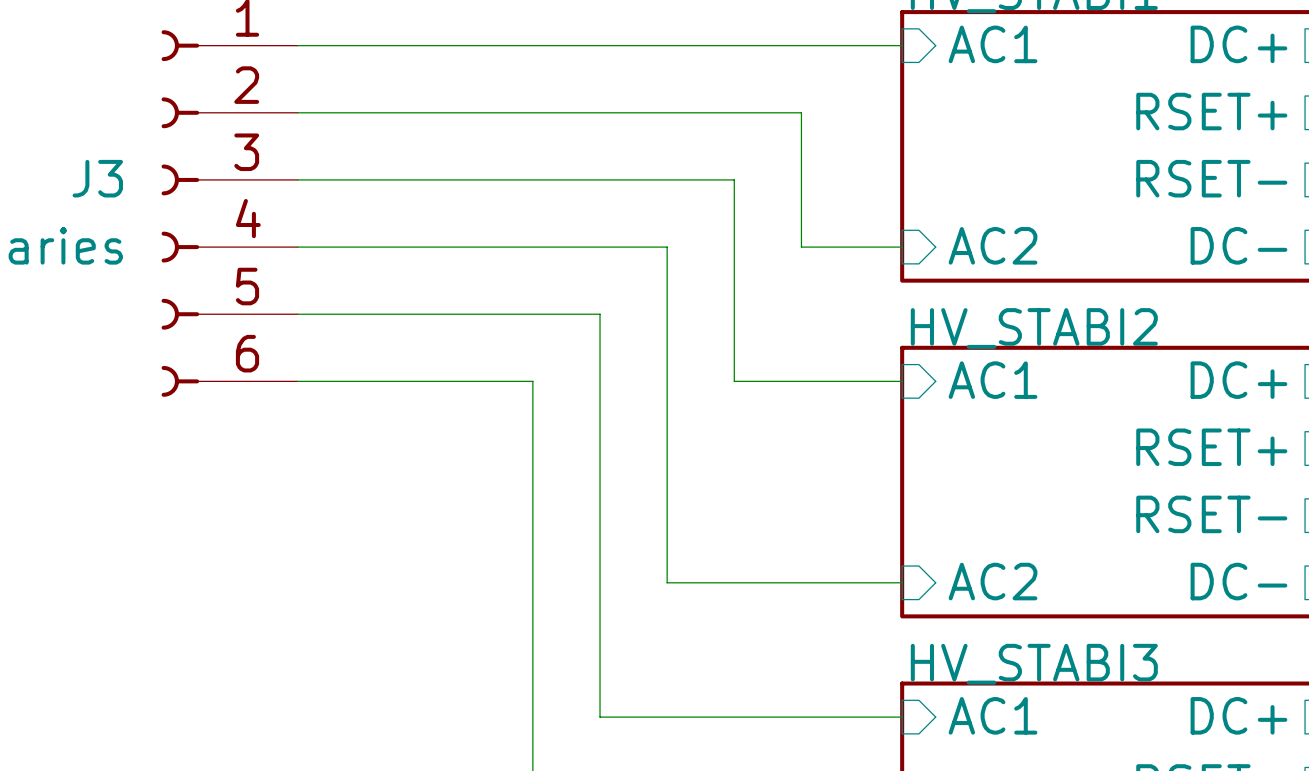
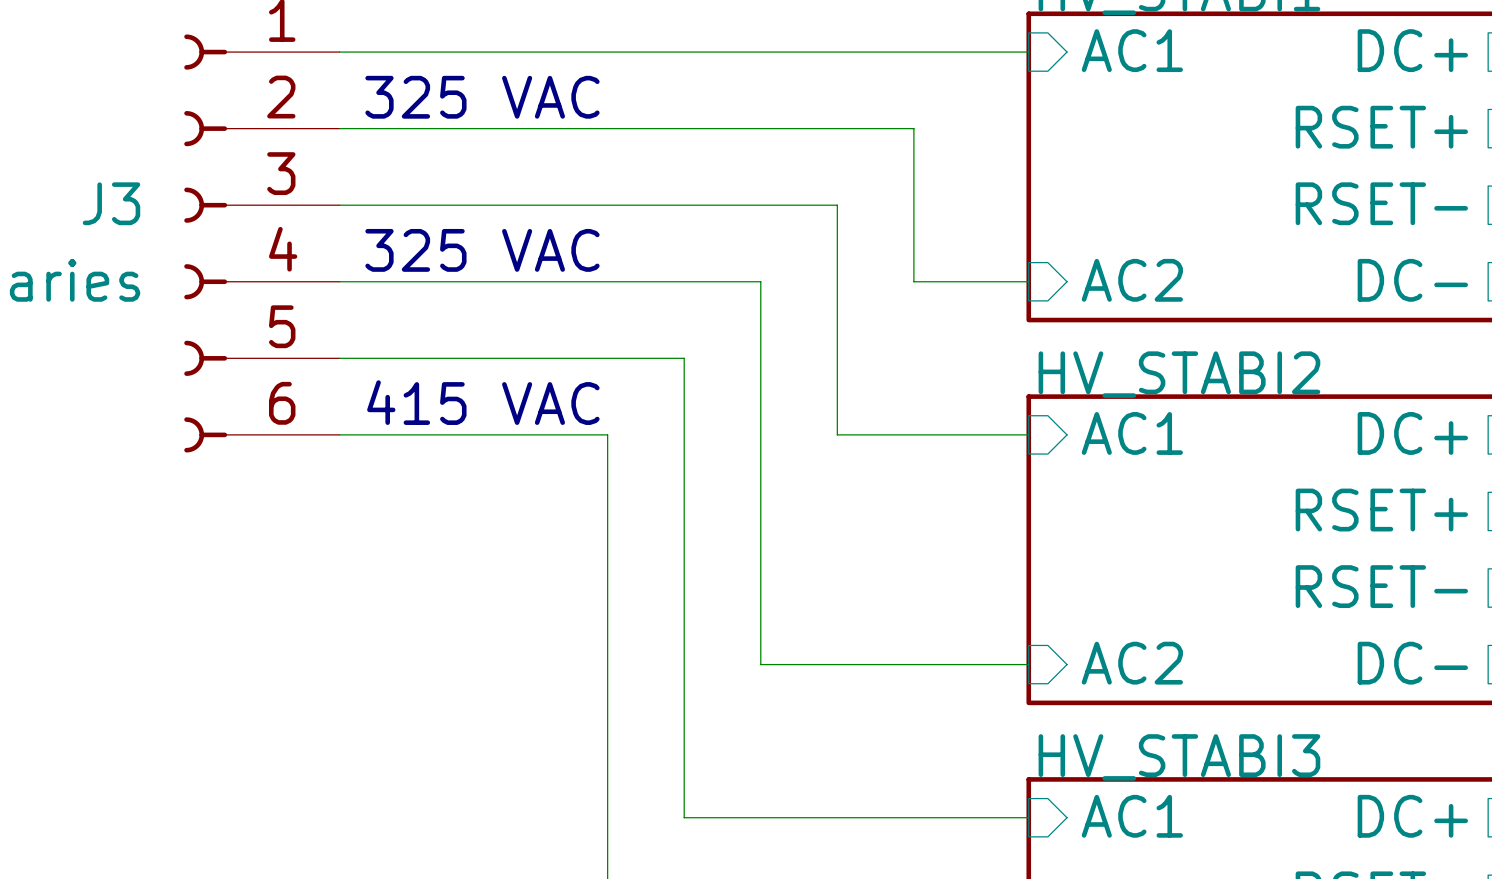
text: none -> 325 VAC (482, 97)
text: none -> 325 VAC (482, 250)
text: none -> 415 VAC (483, 402)

